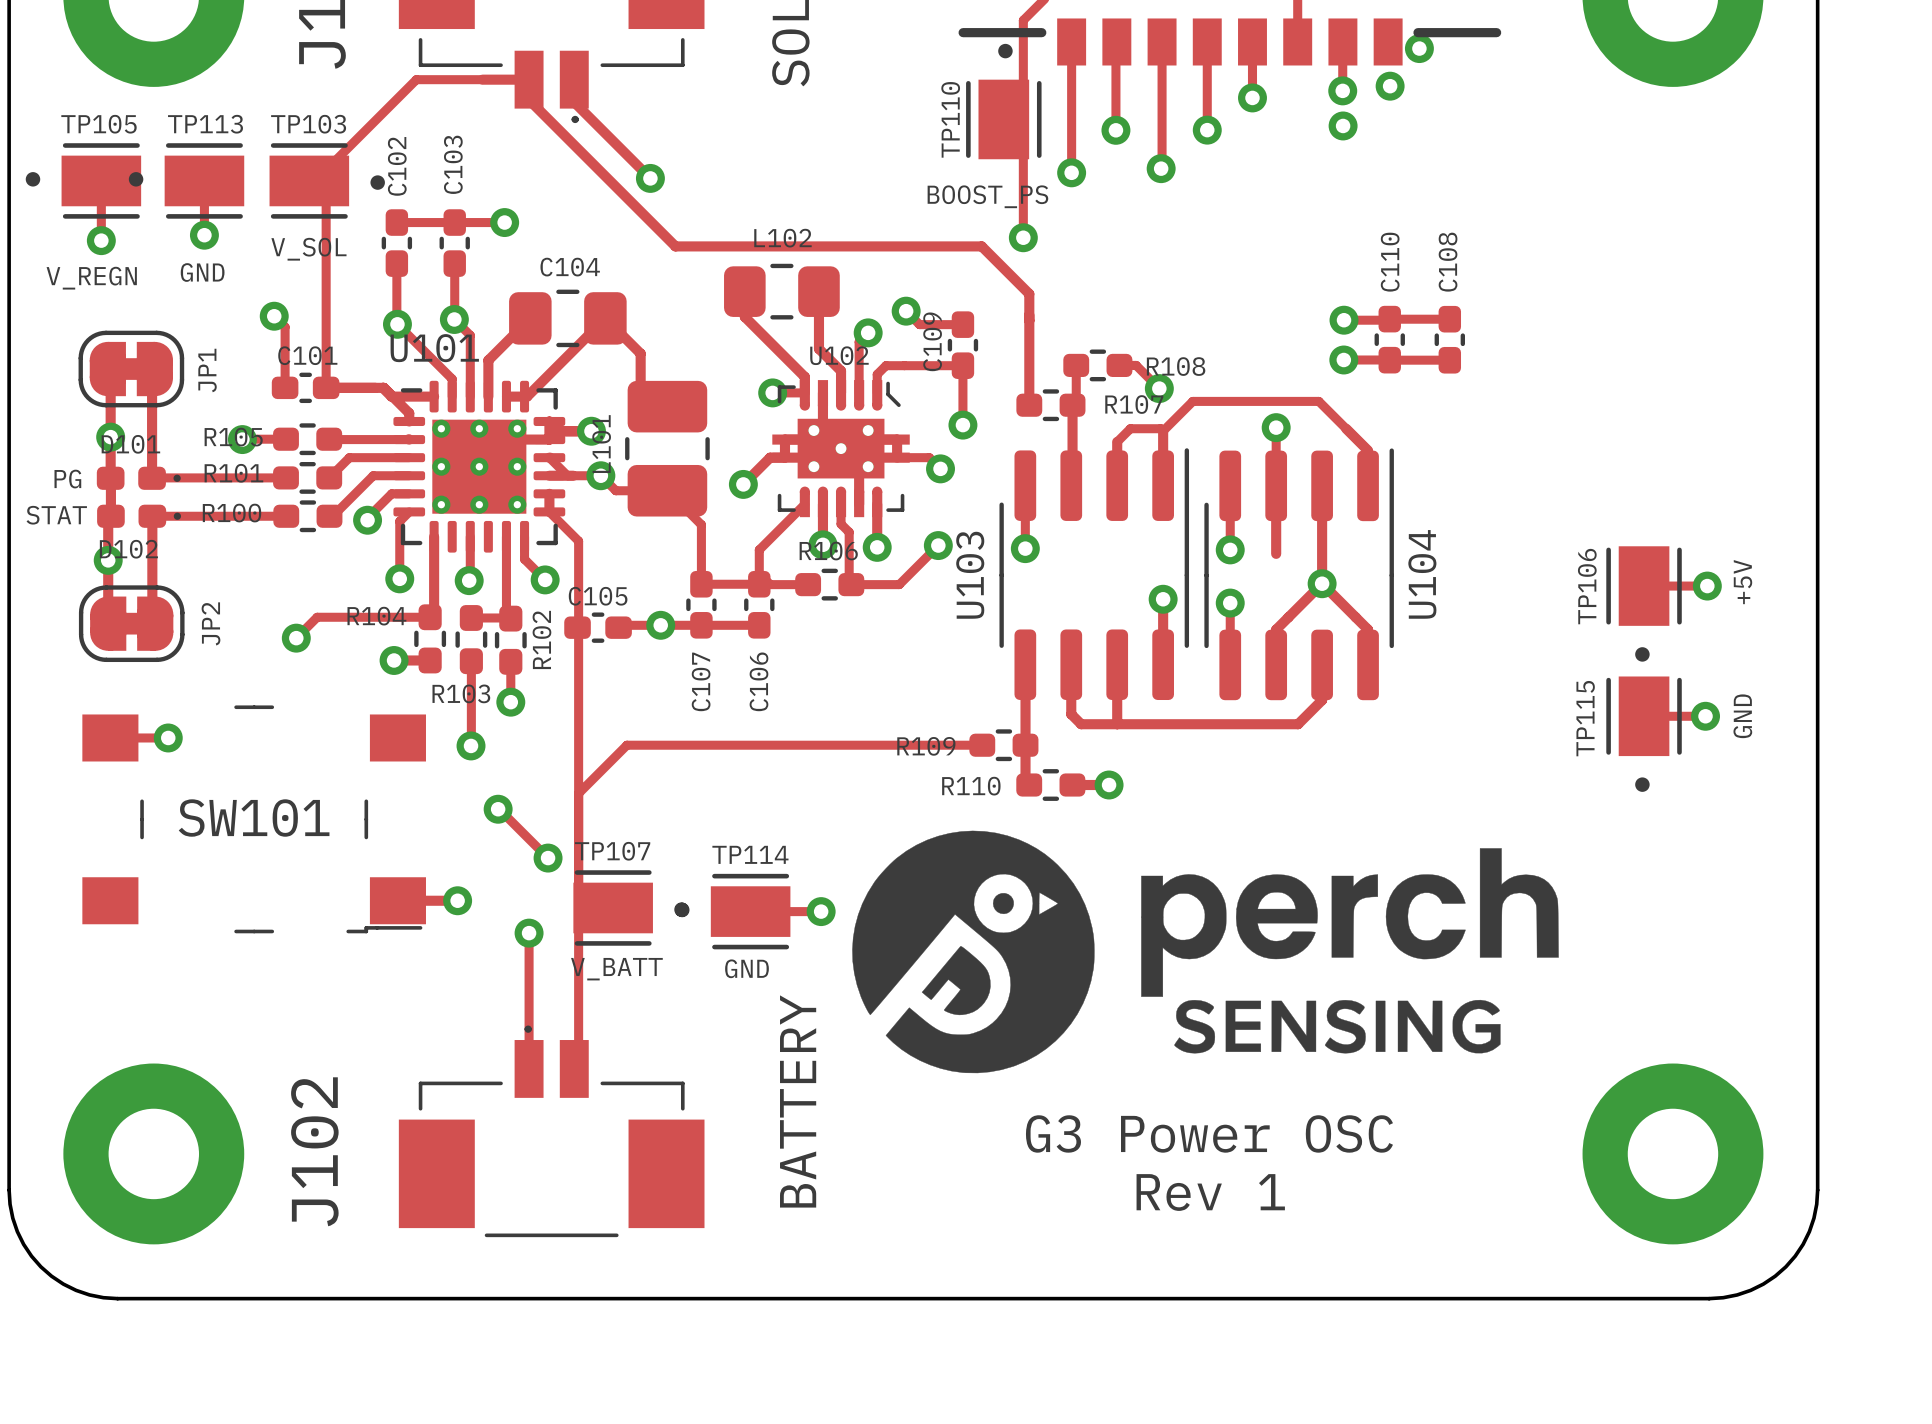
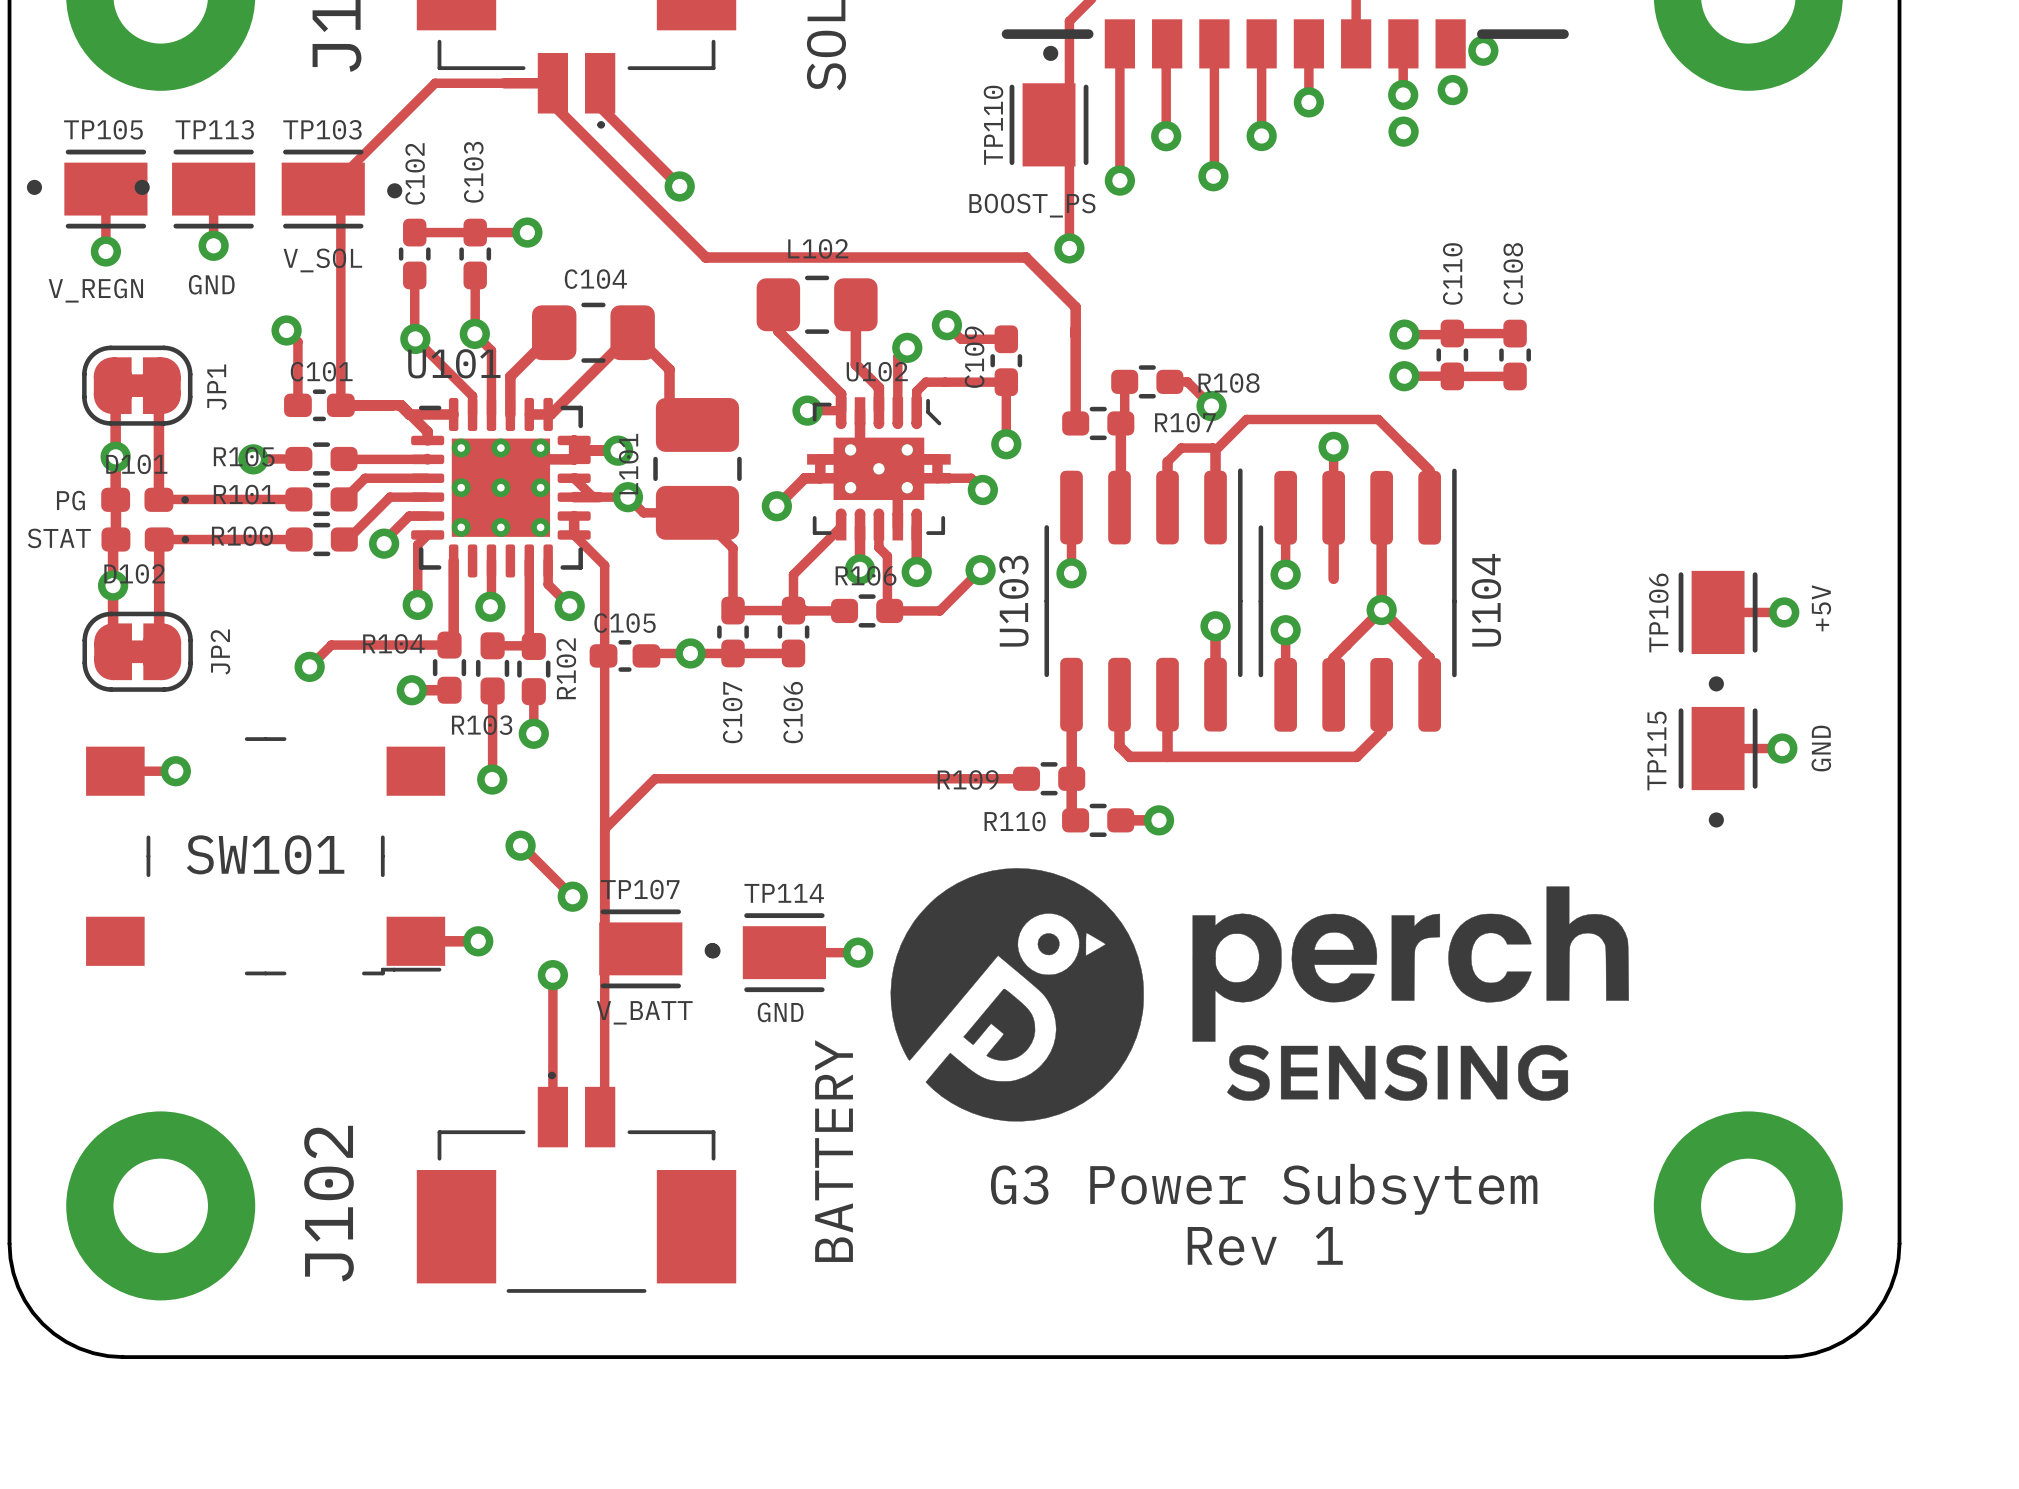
text: G3 Power OSC (1209, 1133) -> G3 Power Subsytem (1264, 1189)

